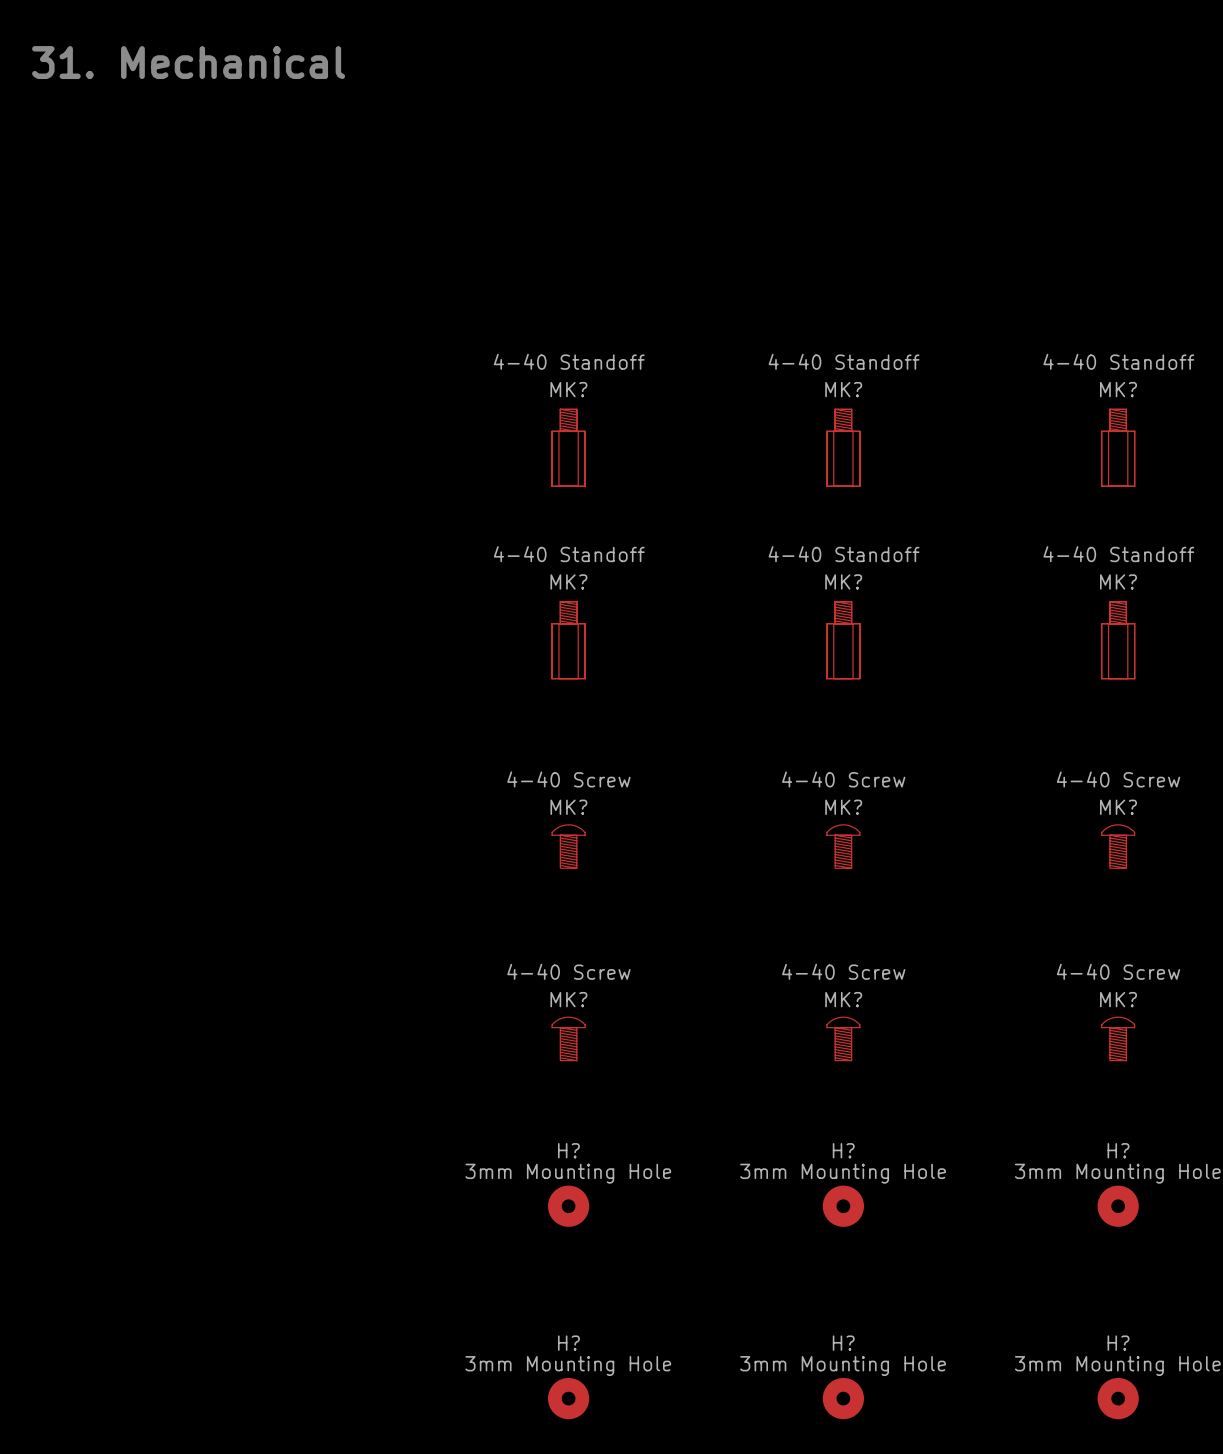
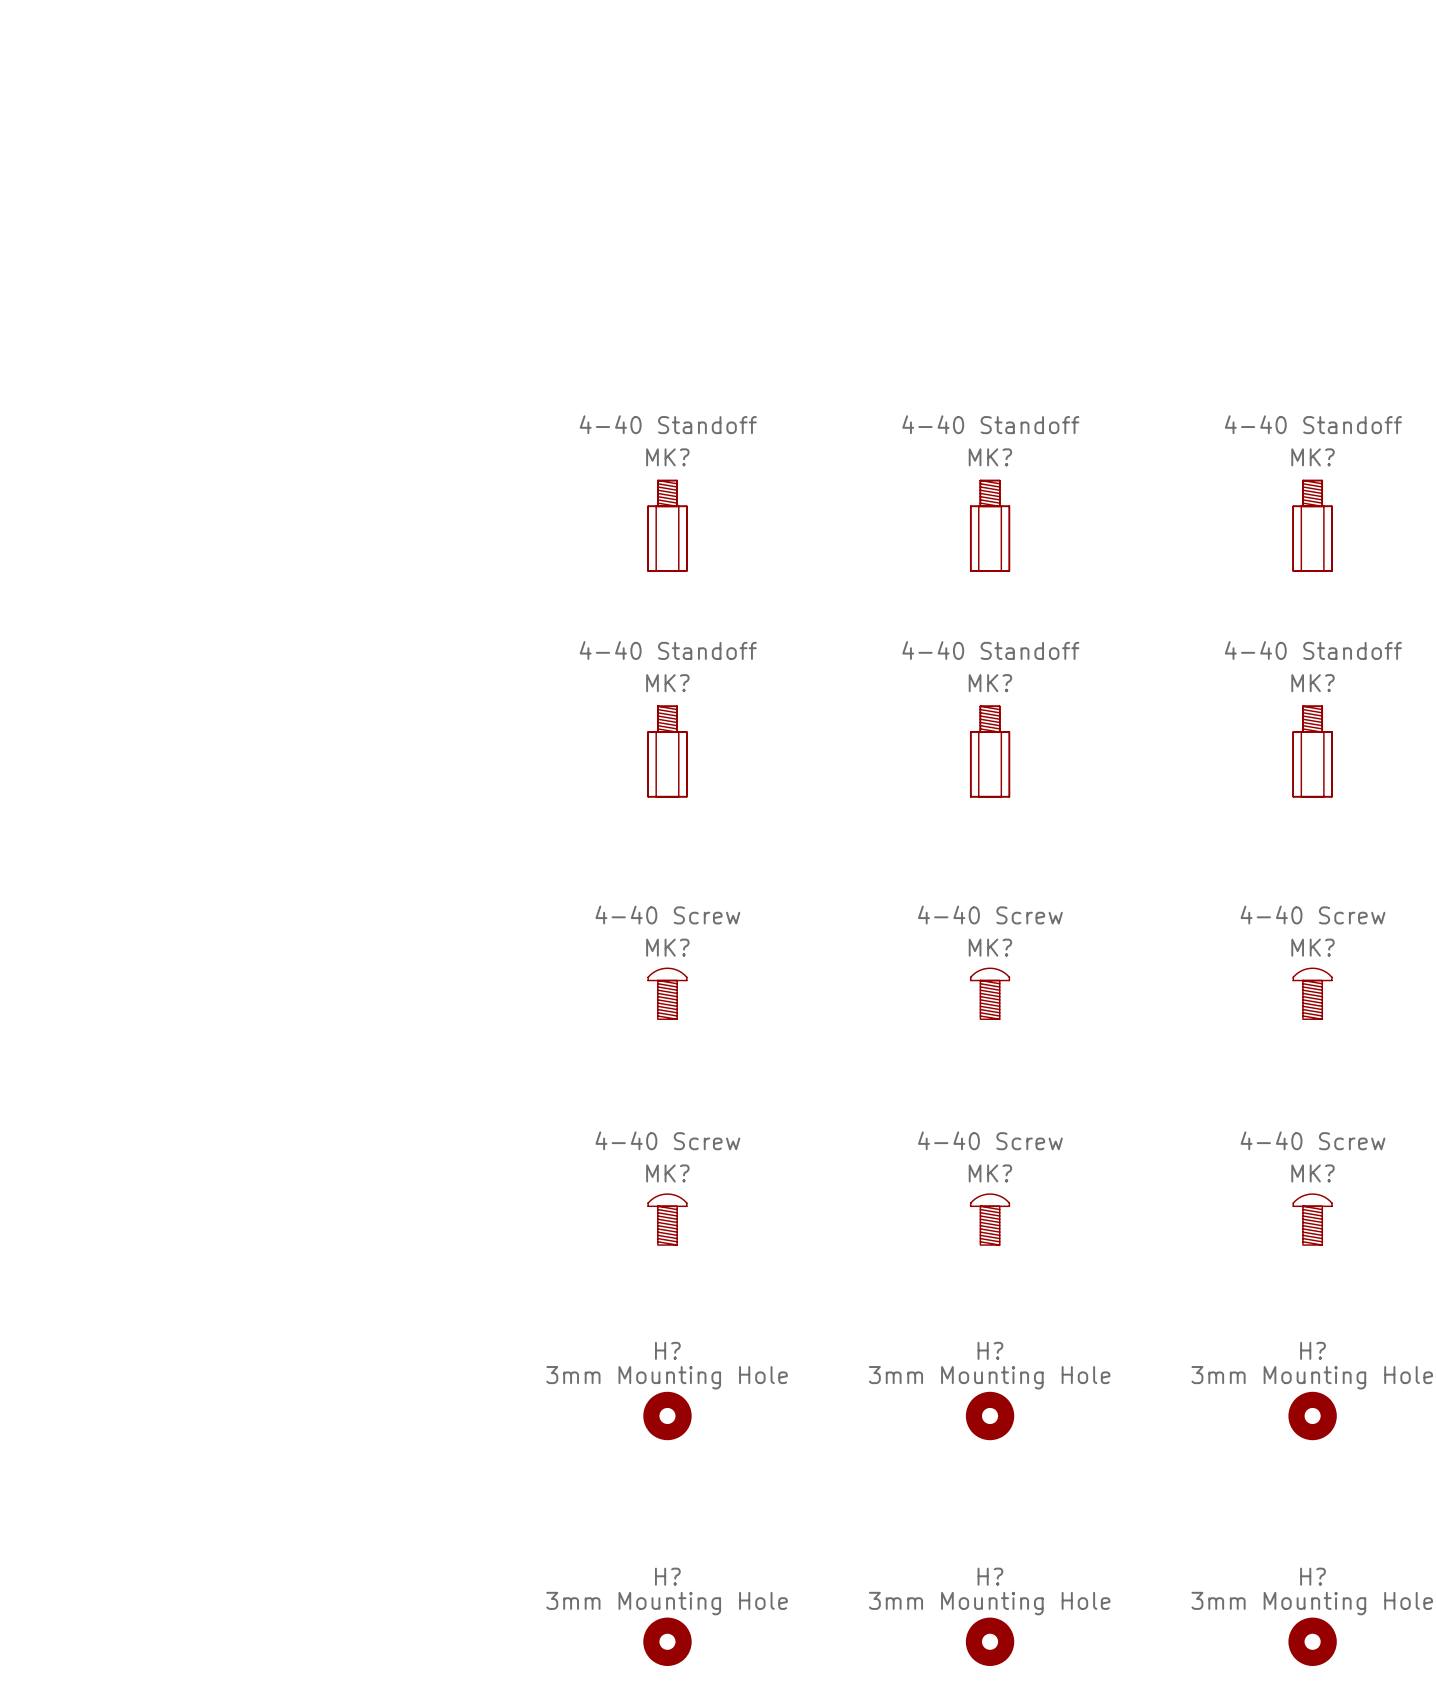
text: 31. Mechanical (188, 62) -> none

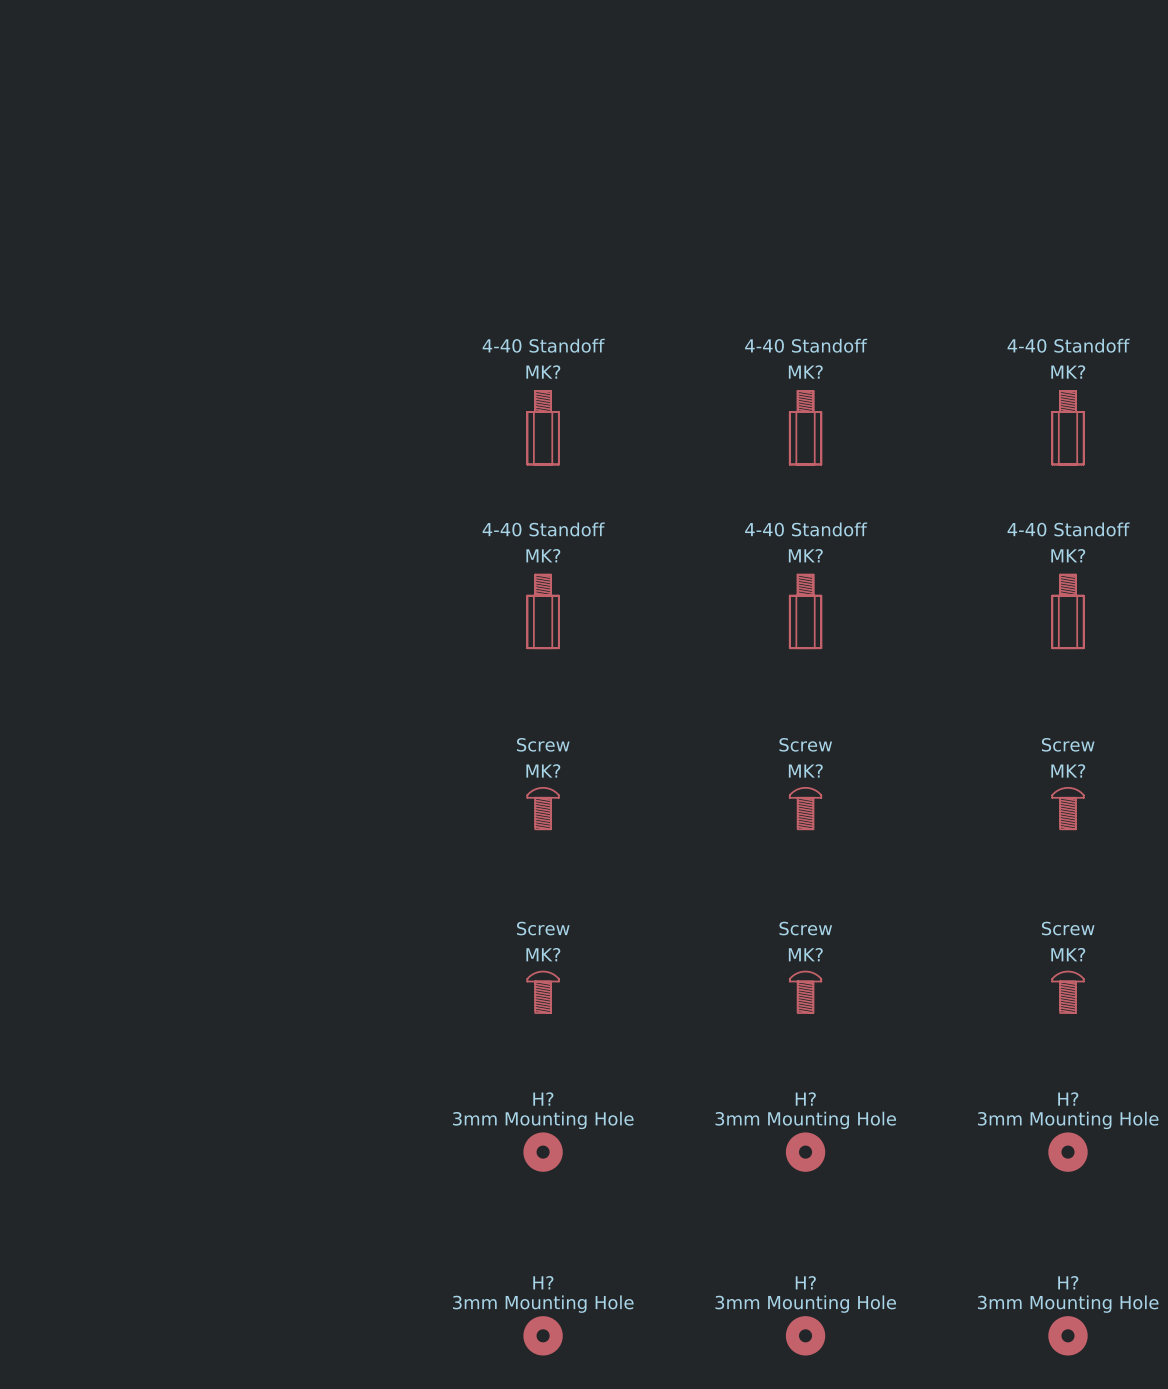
MK? value: 4-40 Screw (667, 915) -> Screw (543, 744)
MK? value: 4-40 Screw (990, 915) -> Screw (805, 744)
MK? value: 4-40 Screw (1313, 915) -> Screw (1068, 744)
MK? value: 4-40 Screw (667, 1140) -> Screw (543, 928)
MK? value: 4-40 Screw (990, 1140) -> Screw (805, 928)
MK? value: 4-40 Screw (1313, 1140) -> Screw (1068, 928)

